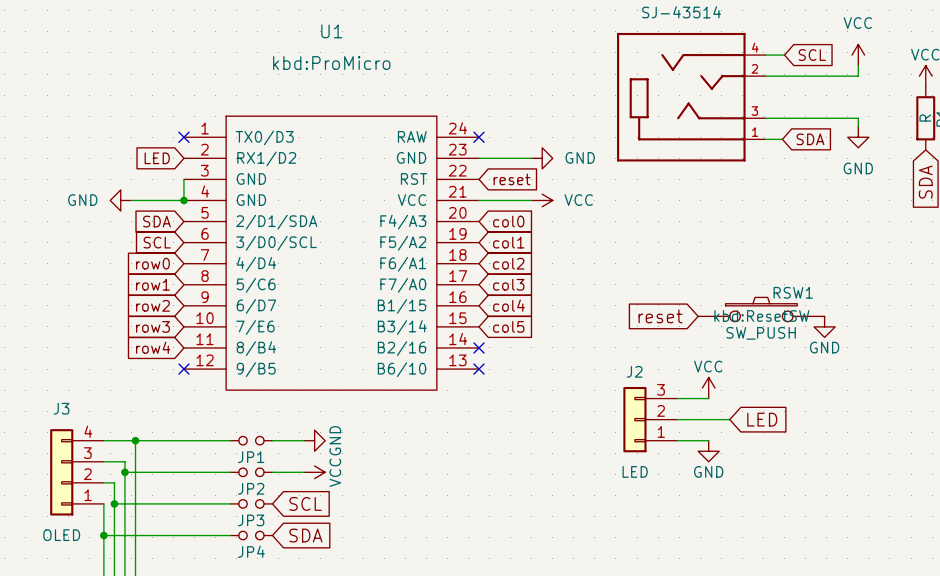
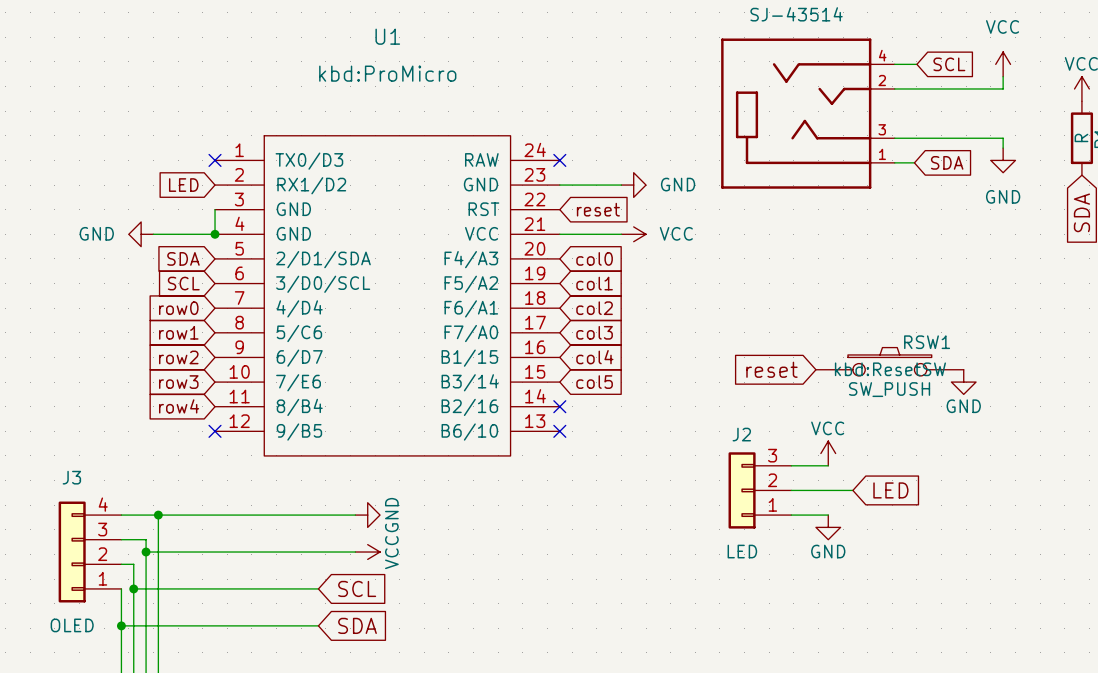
wire: none -> (269, 515) (318, 515)
JP1: (251, 440) -> none
wire: none -> (269, 552) (318, 552)
JP2: (251, 472) -> none
wire: none -> (269, 588) (318, 588)
JP3: (251, 503) -> none
wire: none -> (269, 625) (318, 625)
JP4: (251, 535) -> none

